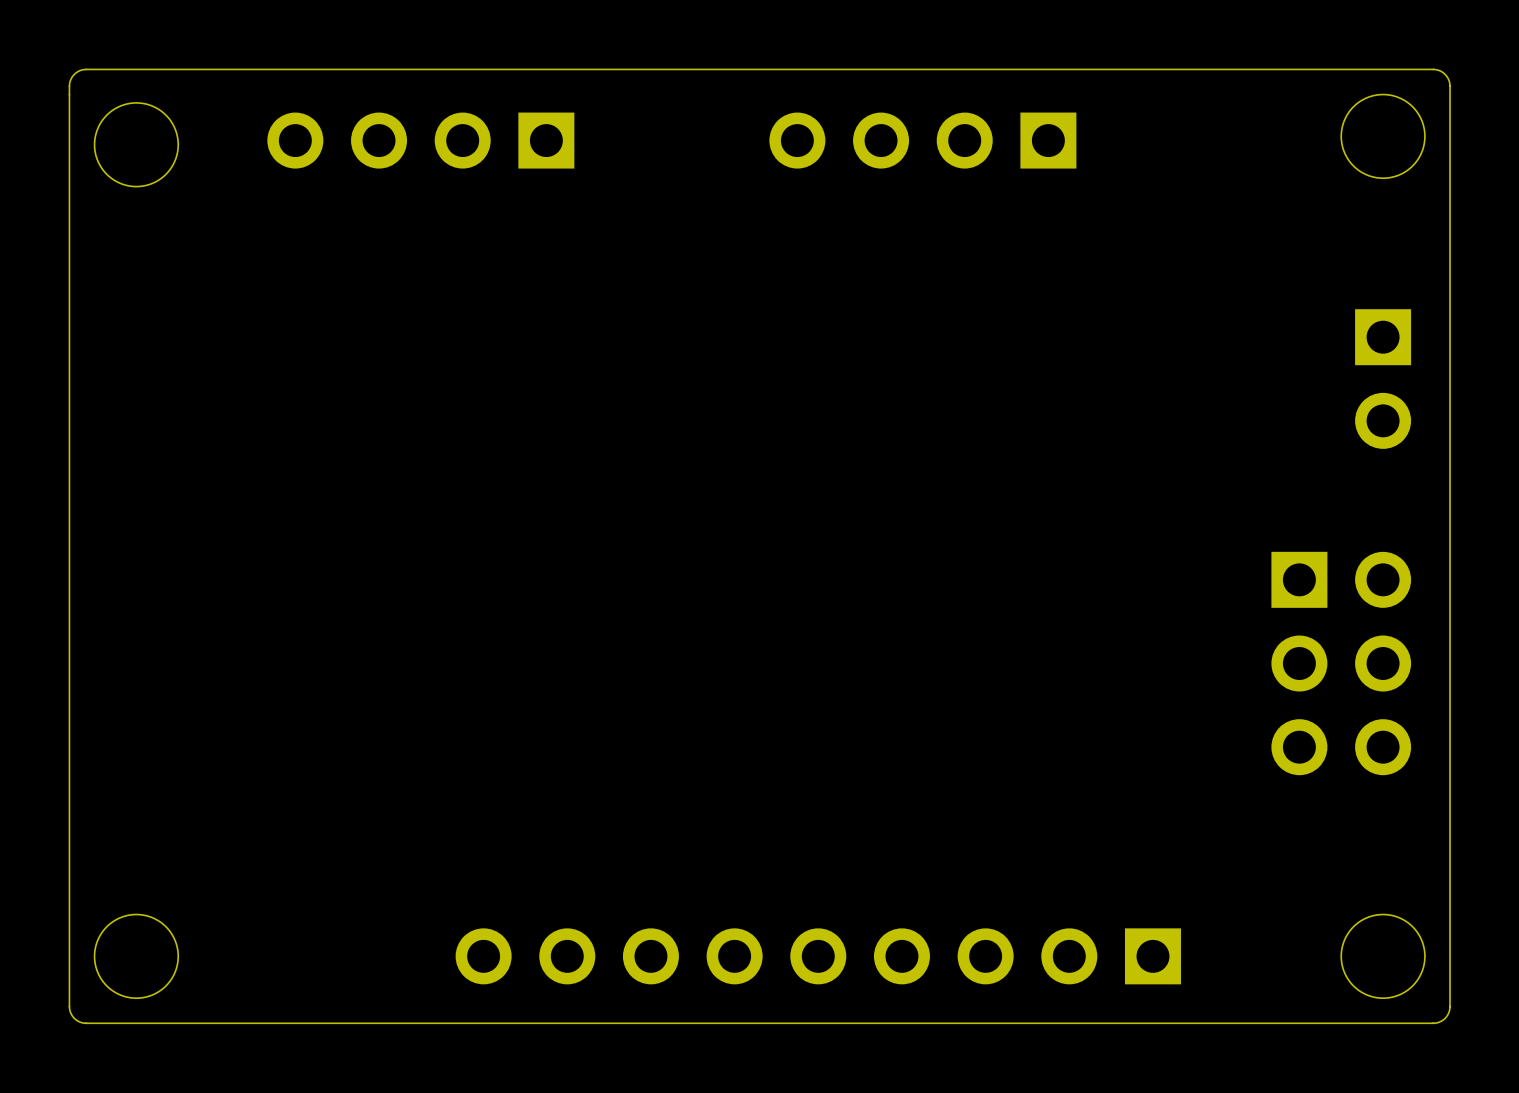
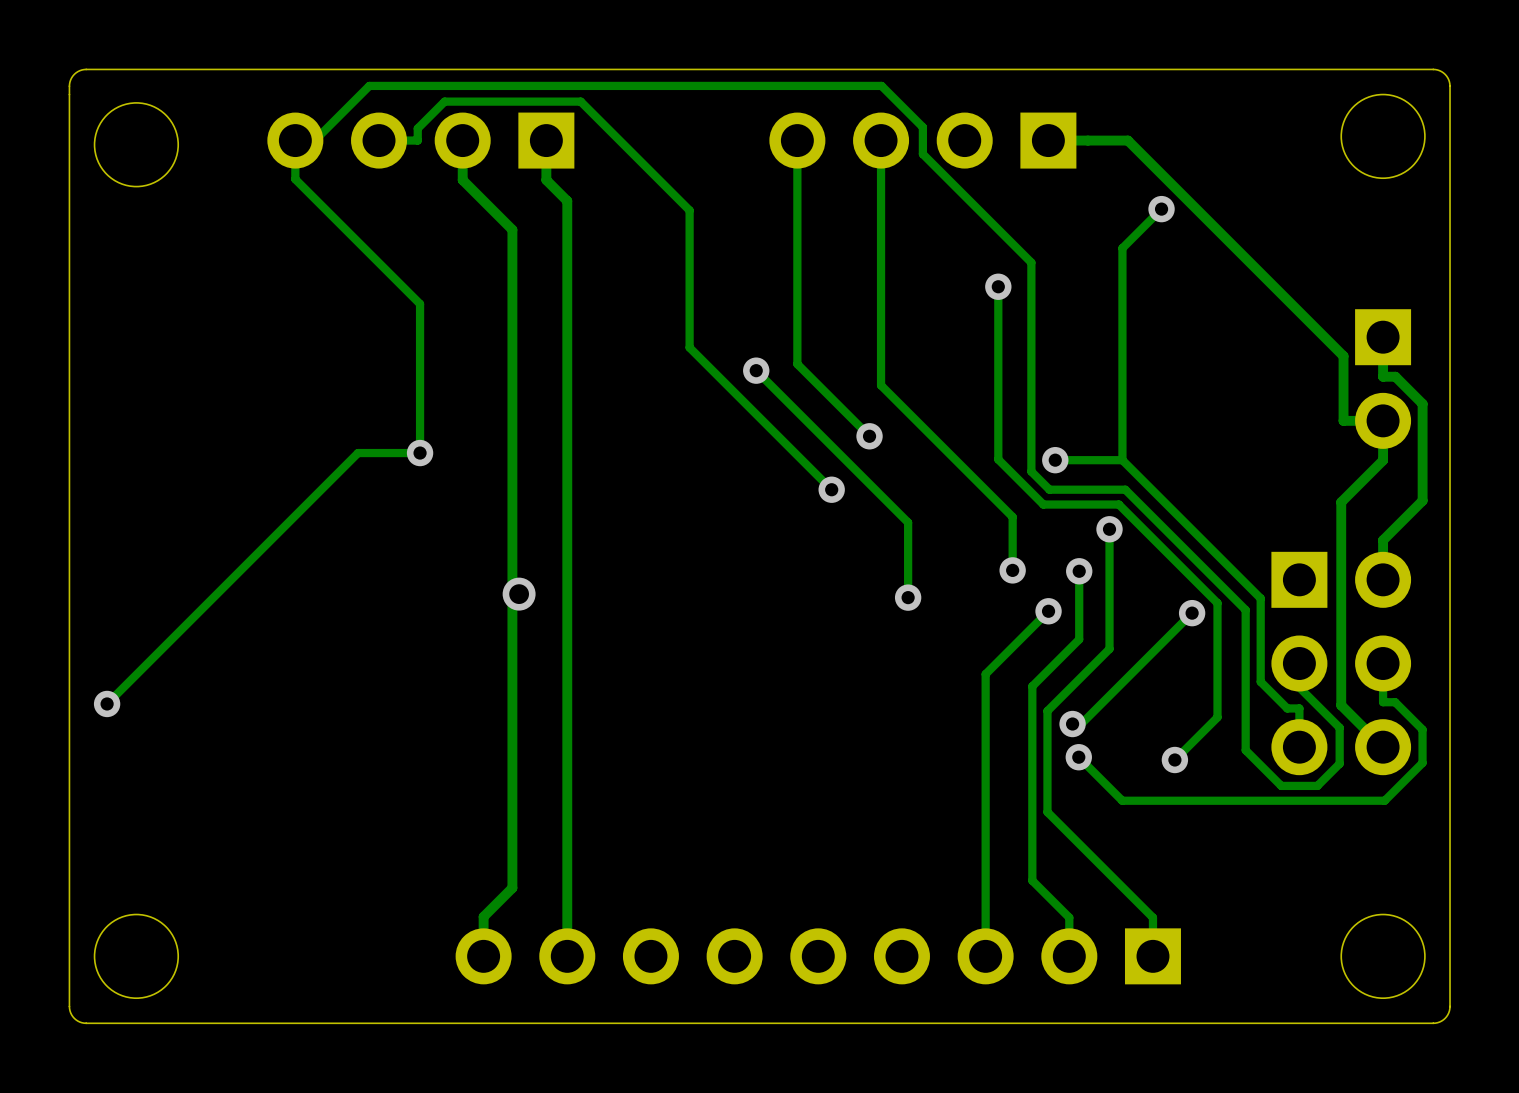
track: none -> (295, 140) (295, 179) (420, 303) (420, 453) (358, 453) (107, 703)
track: none -> (379, 140) (417, 140) (417, 128) (444, 101) (580, 101) (689, 210) (689, 347) (831, 489)
track: none -> (462, 140) (462, 180) (512, 229) (512, 888) (483, 916) (483, 956)
track: none -> (546, 140) (546, 180) (567, 201) (567, 956)
track: none -> (797, 140) (797, 364) (869, 436)
track: none -> (881, 140) (881, 385) (1012, 516) (1012, 570)
track: none -> (1048, 140) (1127, 140) (1343, 356) (1343, 420) (1383, 420) (1383, 460) (1341, 502) (1341, 705) (1383, 747)
track: none -> (295, 159) (369, 85) (881, 85) (922, 127) (922, 154) (1031, 262) (1031, 471) (1049, 489) (1125, 489) (1245, 610) (1245, 750) (1281, 785) (1317, 785) (1339, 763) (1339, 727) (1299, 687) (1299, 663)
track: none -> (1161, 209) (1122, 248) (1122, 460)
via: none -> (1161, 209)
track: none -> (998, 286) (998, 459) (1043, 504) (1118, 504) (1217, 603) (1217, 717) (1174, 759)
via: none -> (998, 286)
track: none -> (1383, 337) (1383, 376) (1395, 376) (1422, 403) (1422, 500) (1383, 540) (1383, 579)
track: none -> (756, 370) (908, 522) (908, 597)
via: none -> (756, 370)
via: none -> (869, 436)
via: none -> (420, 453)
via: none -> (1055, 460)
track: none -> (1122, 460) (1260, 598) (1260, 681) (1287, 708) (1299, 708) (1299, 747)
track: none -> (1122, 460) (1055, 460)
via: none -> (831, 489)
track: none -> (1109, 529) (1109, 648) (1047, 711) (1047, 812) (1152, 917) (1152, 956)
via: none -> (1109, 529)
via: none -> (1012, 570)
track: none -> (1079, 571) (1079, 639) (1032, 686) (1032, 880) (1069, 917) (1069, 956)
via: none -> (1079, 571)
via: none -> (519, 594)
via: none -> (908, 597)
track: none -> (1048, 611) (985, 674) (985, 956)
via: none -> (1048, 611)
track: none -> (1192, 613) (1081, 724) (1072, 724)
via: none -> (1192, 613)
track: none -> (1383, 663) (1383, 702) (1395, 702) (1422, 729) (1422, 762) (1384, 800) (1122, 800) (1078, 757)
via: none -> (107, 703)
via: none -> (1072, 724)
via: none -> (1078, 757)
via: none -> (1174, 759)

